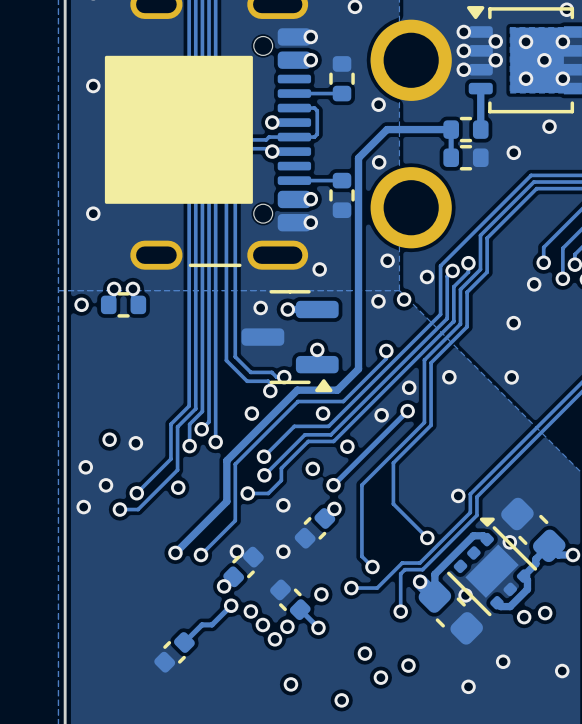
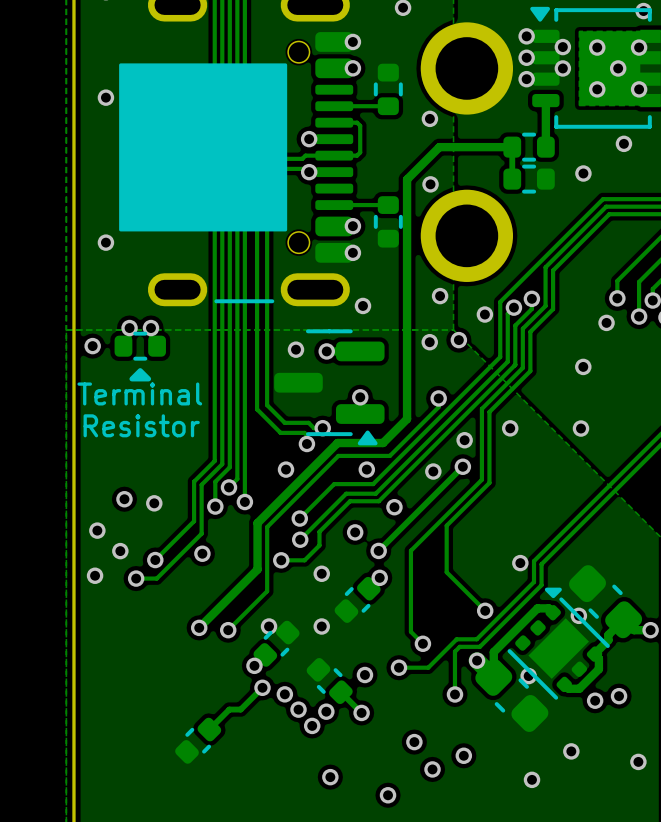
drawing: none -> [129, 368, 152, 382]
text: none -> Terminal (139, 393)
text: none -> Resistor (141, 425)

